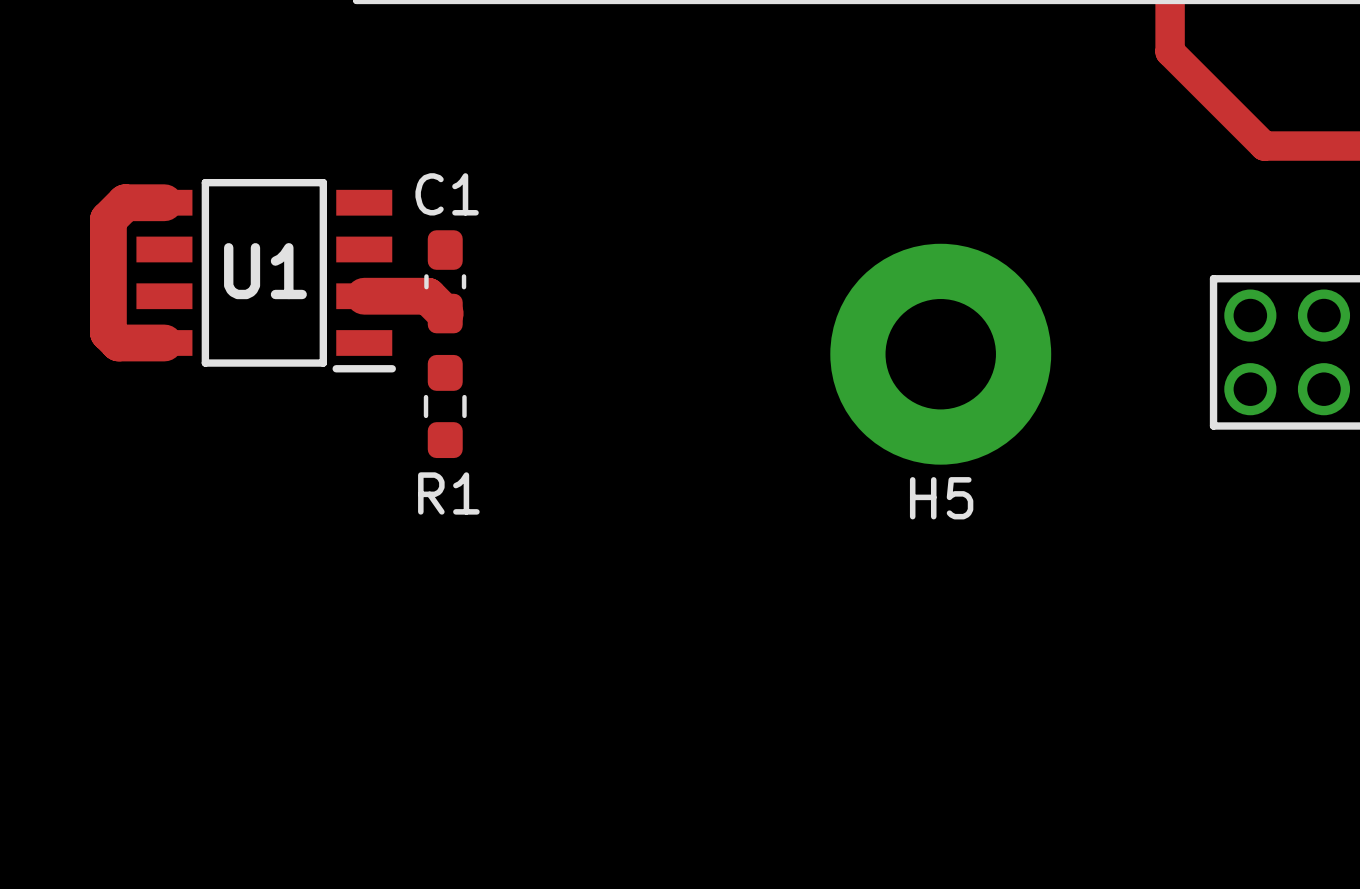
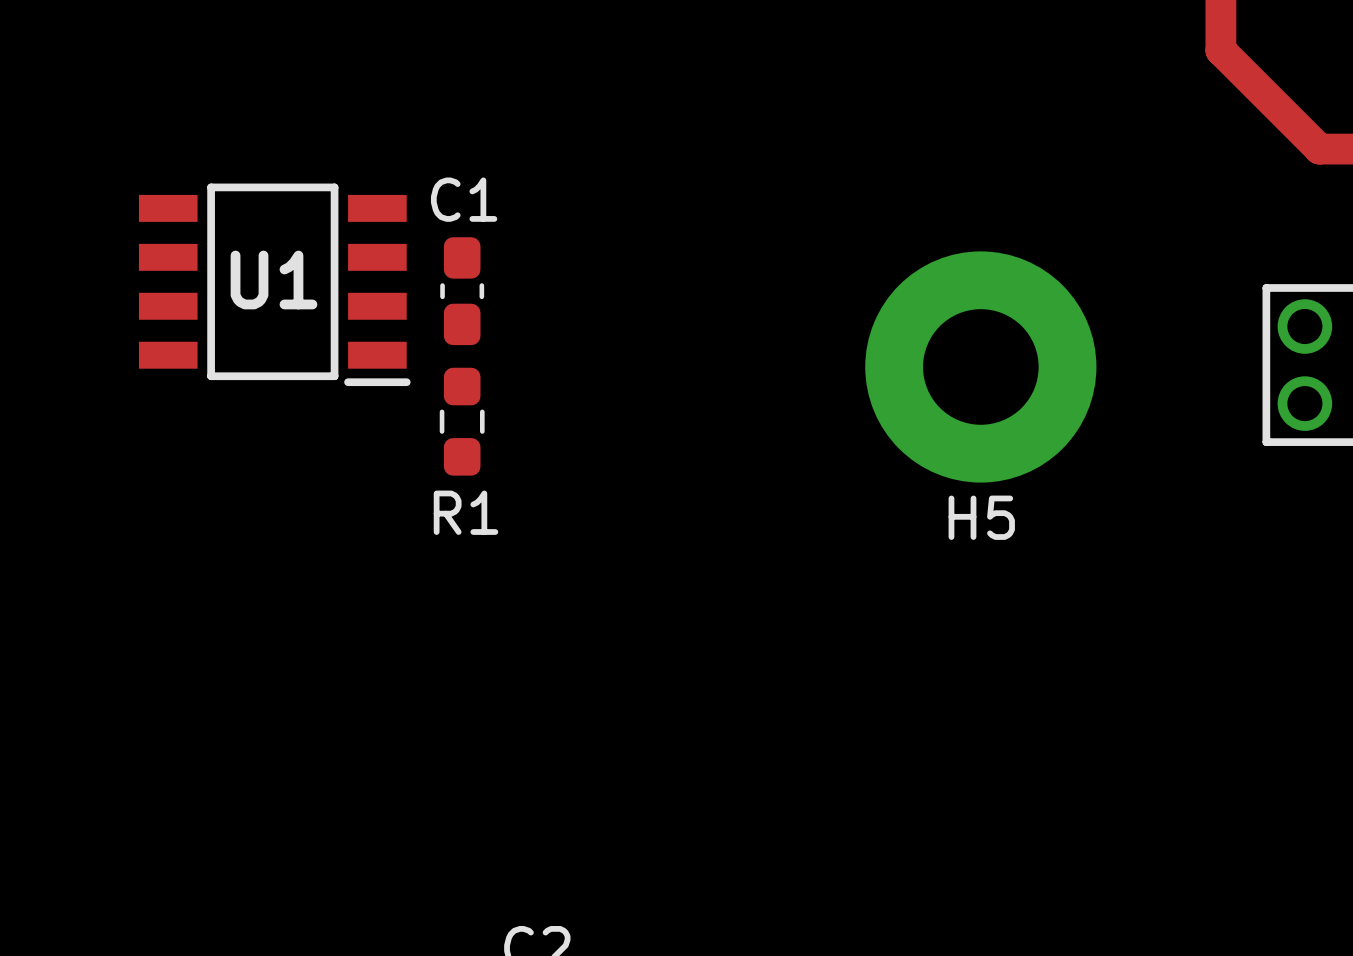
track: (164, 202) (125, 202) (108, 219) (108, 332) (118, 342) (164, 342) -> none
track: (364, 296) (427, 296) (445, 313) -> none

